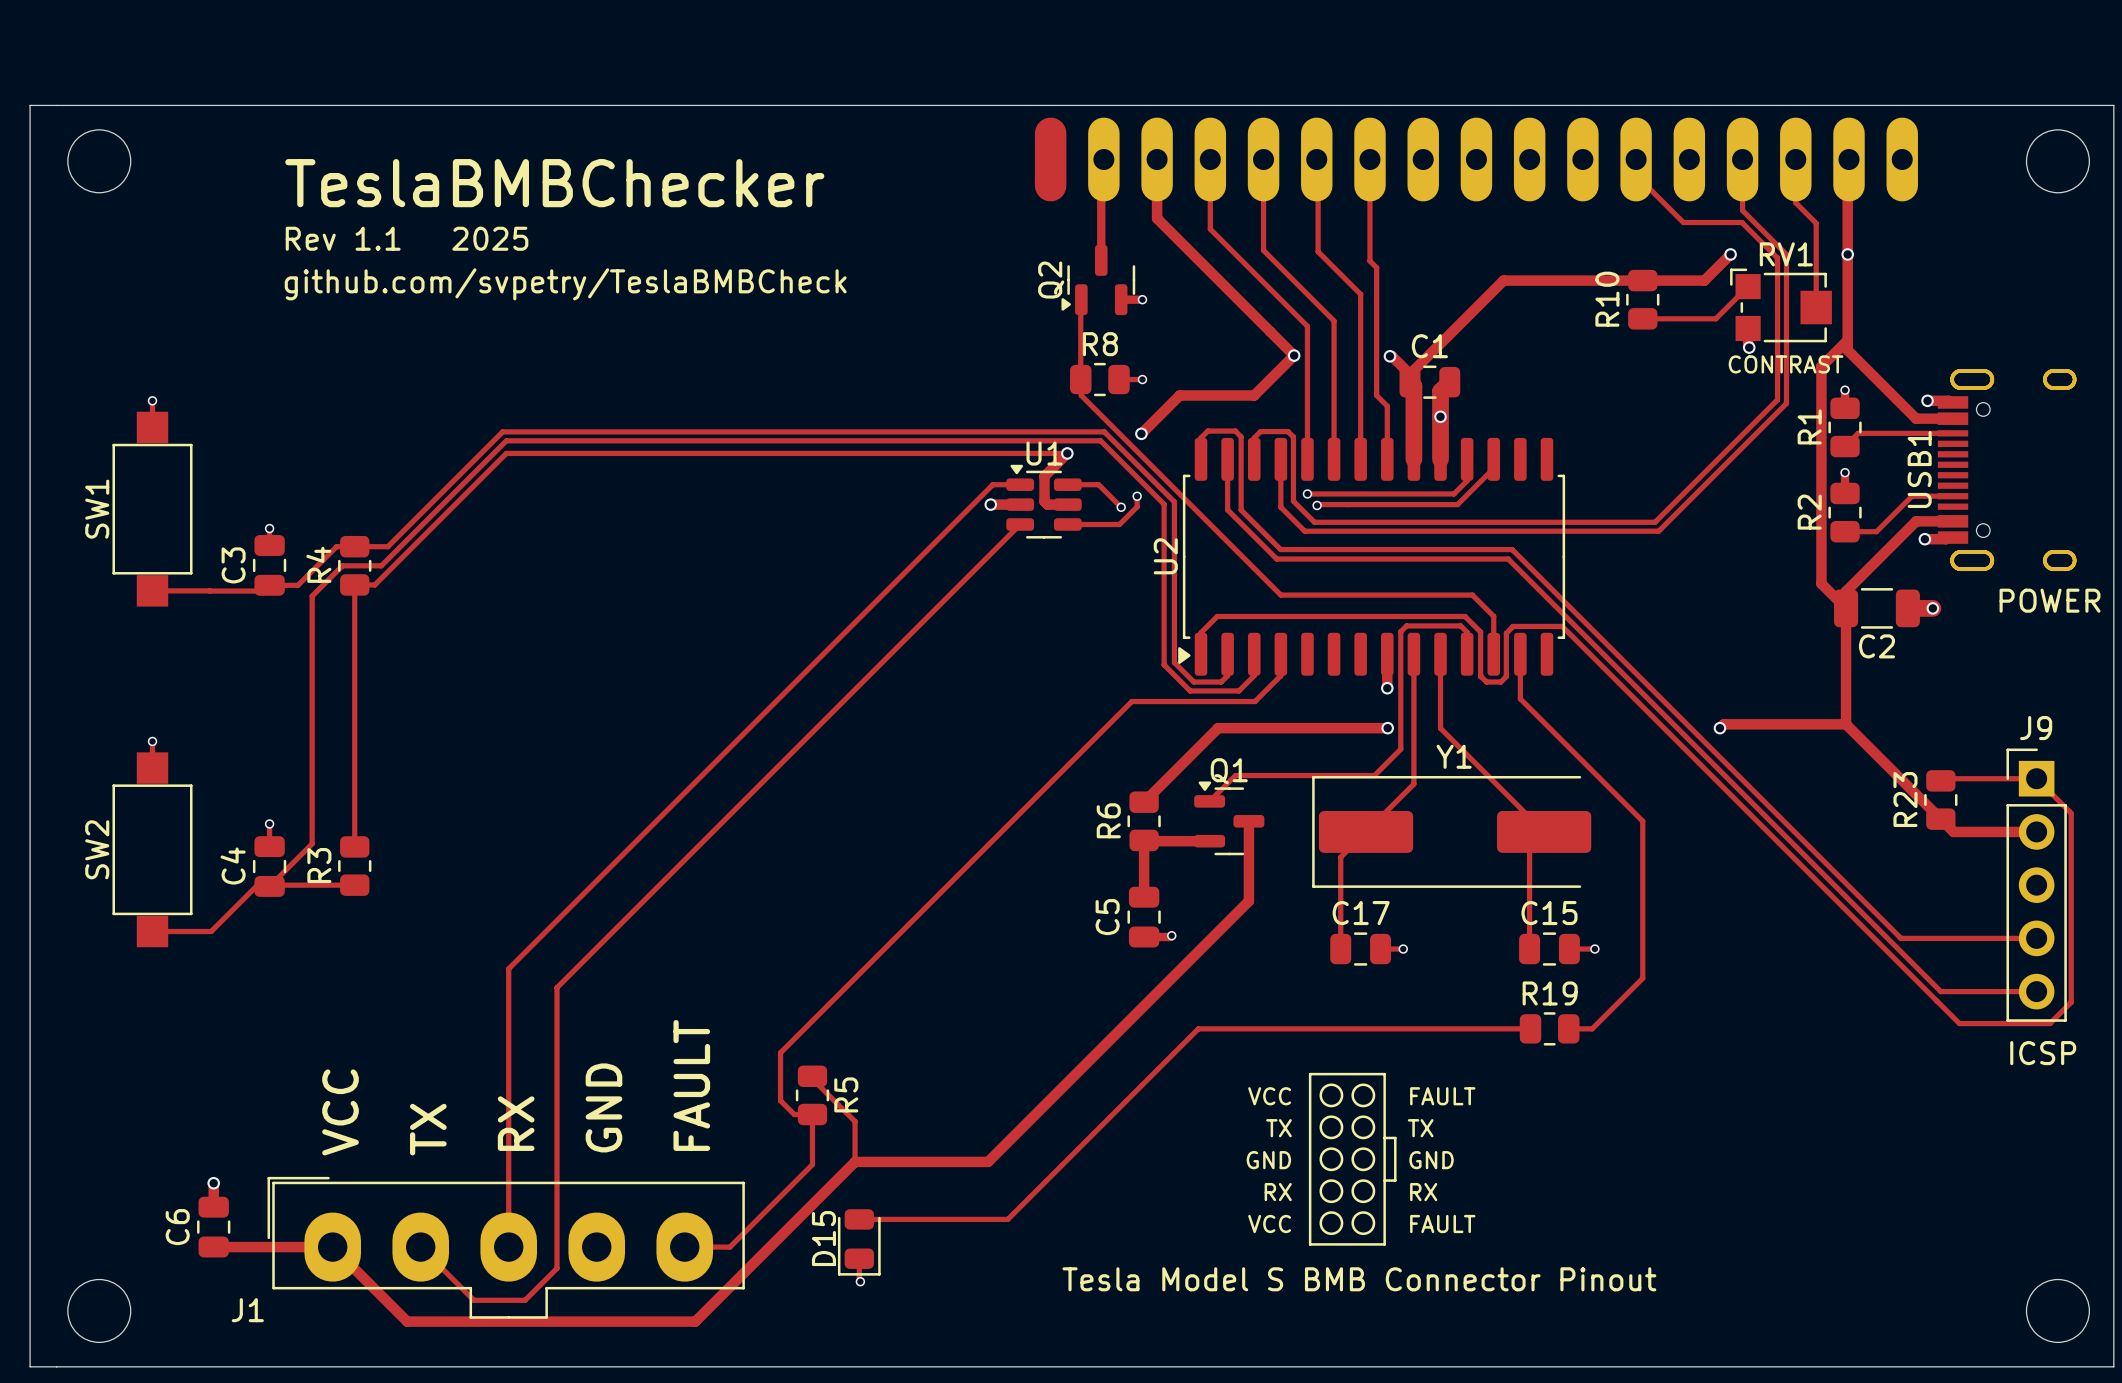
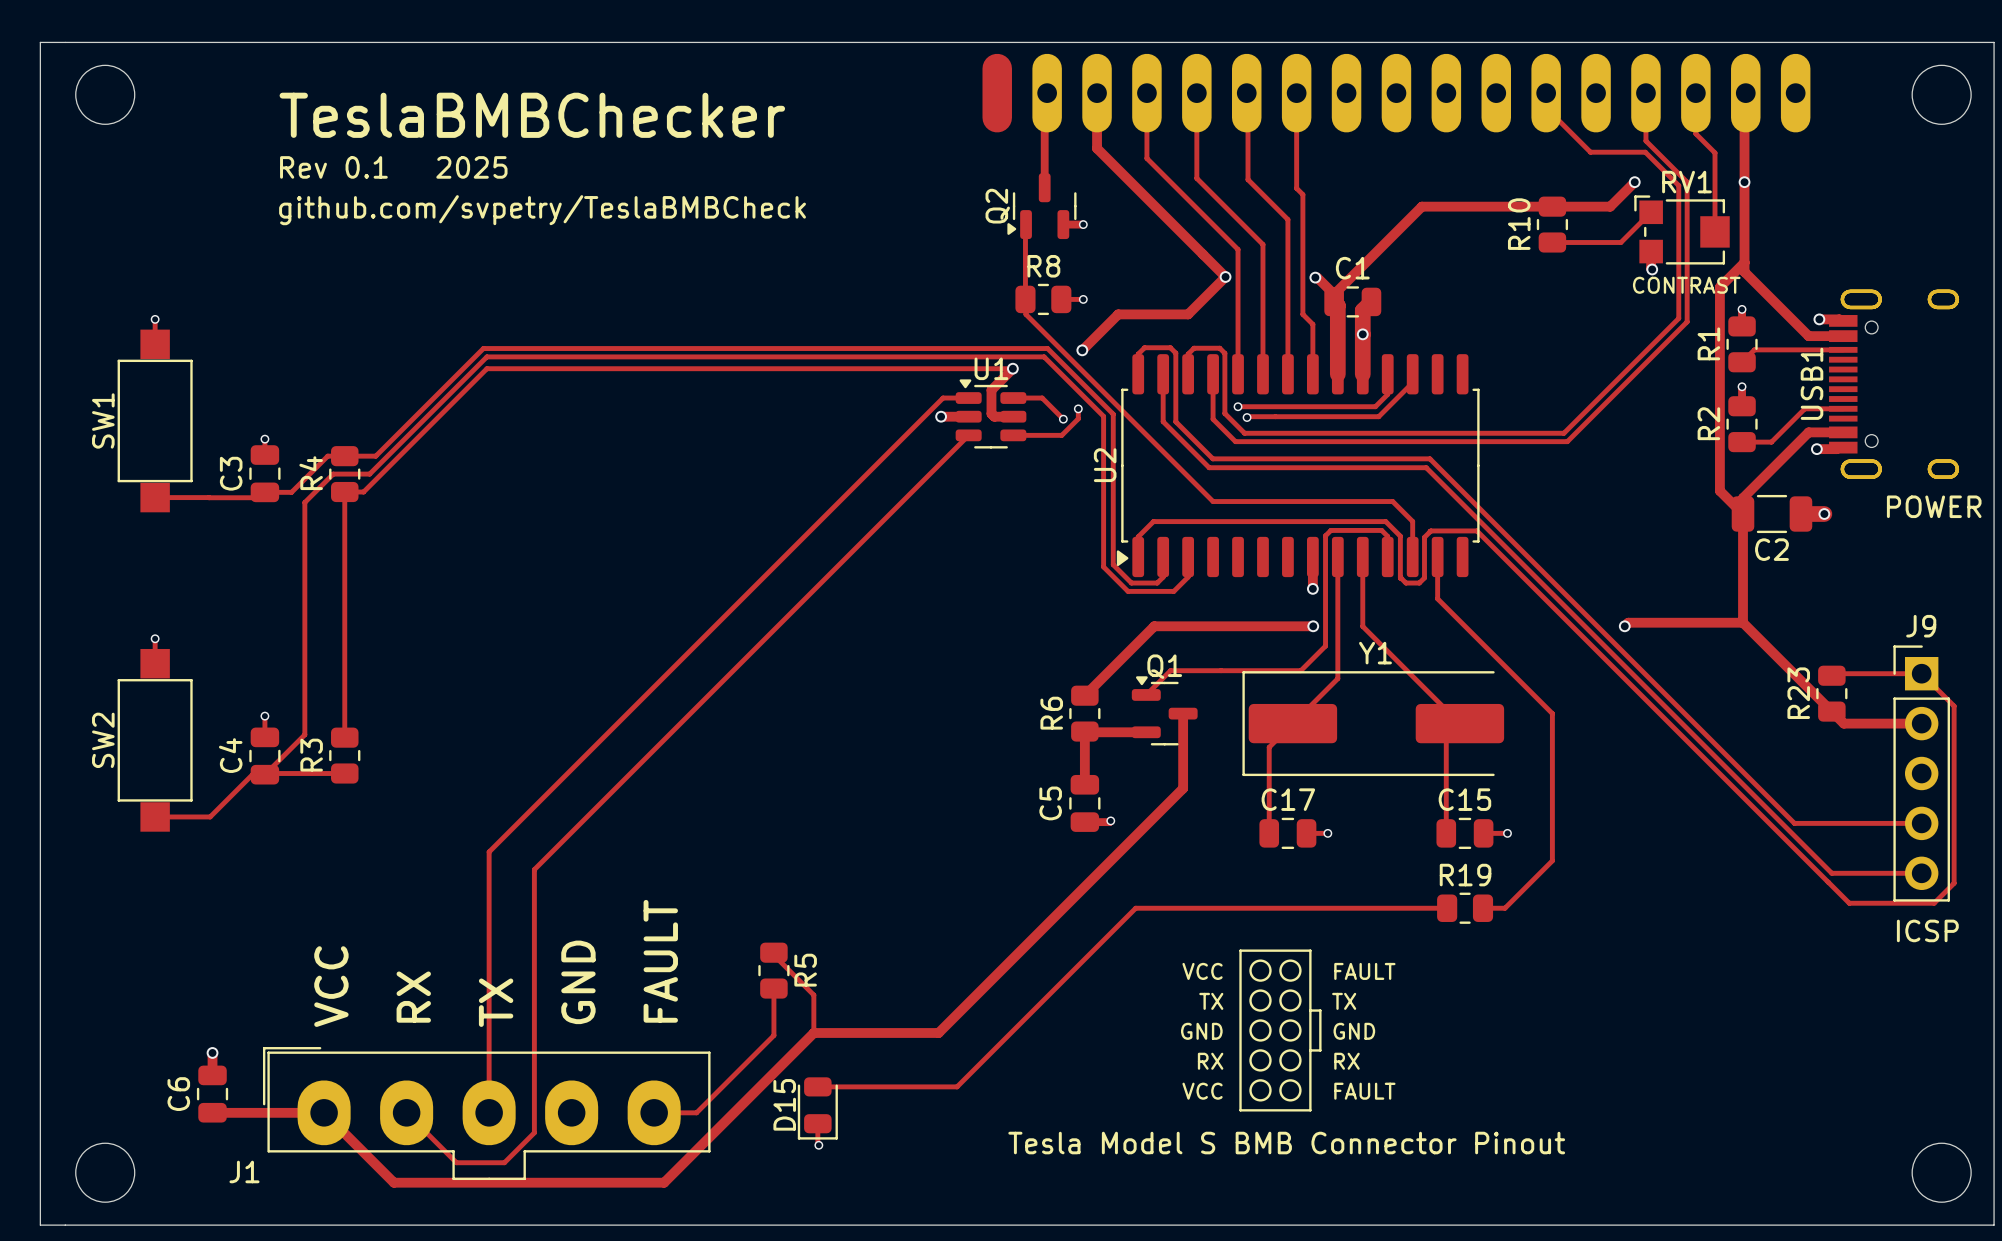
text: Rev 1.1 2025 (407, 238) -> Rev 0.1 2025 (393, 167)
track: (1280, 654) (1280, 675) (1255, 701) (1131, 701) (780, 1052) (780, 1100) (794, 1114) (812, 1114) (812, 1117) -> none
text: RX (516, 1123) -> TX (496, 1002)
text: TX (428, 1129) -> RX (413, 997)

